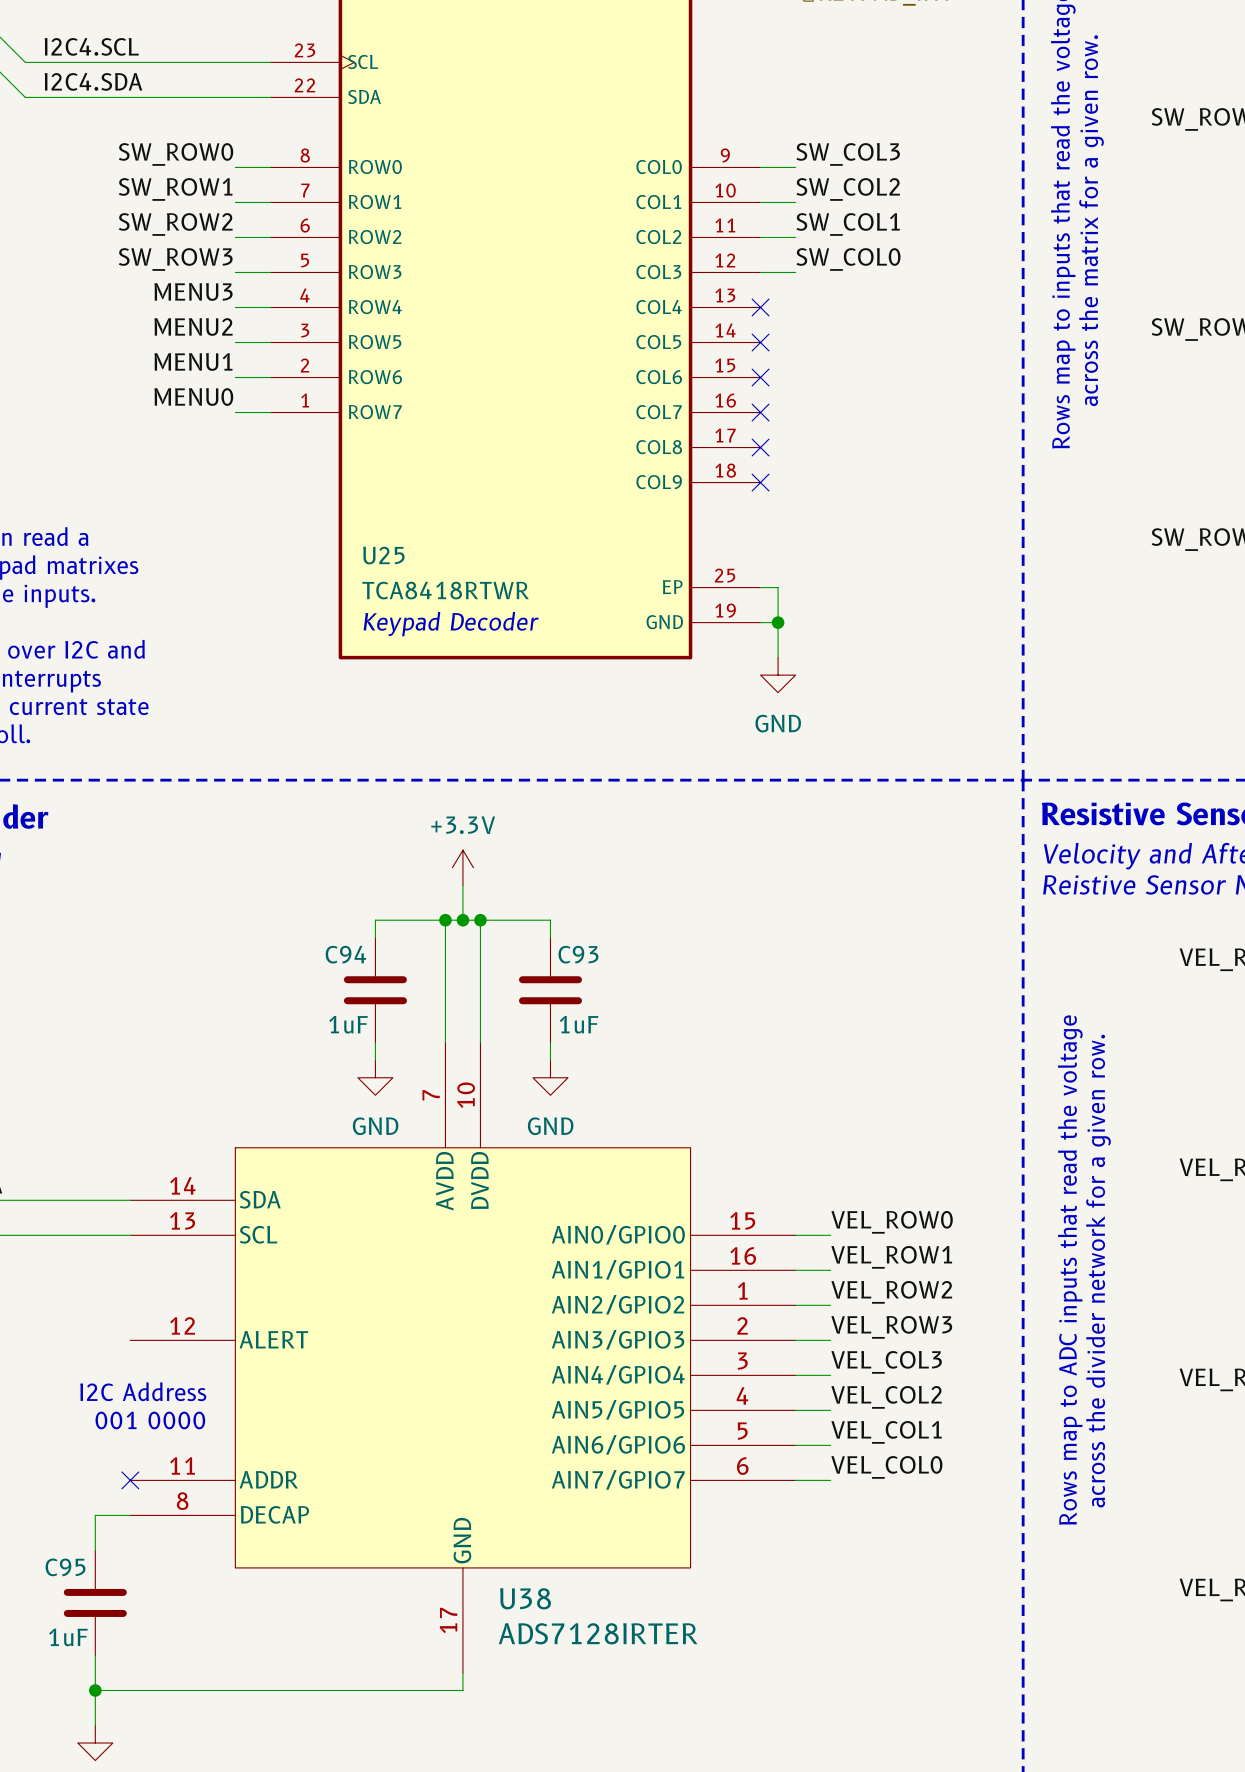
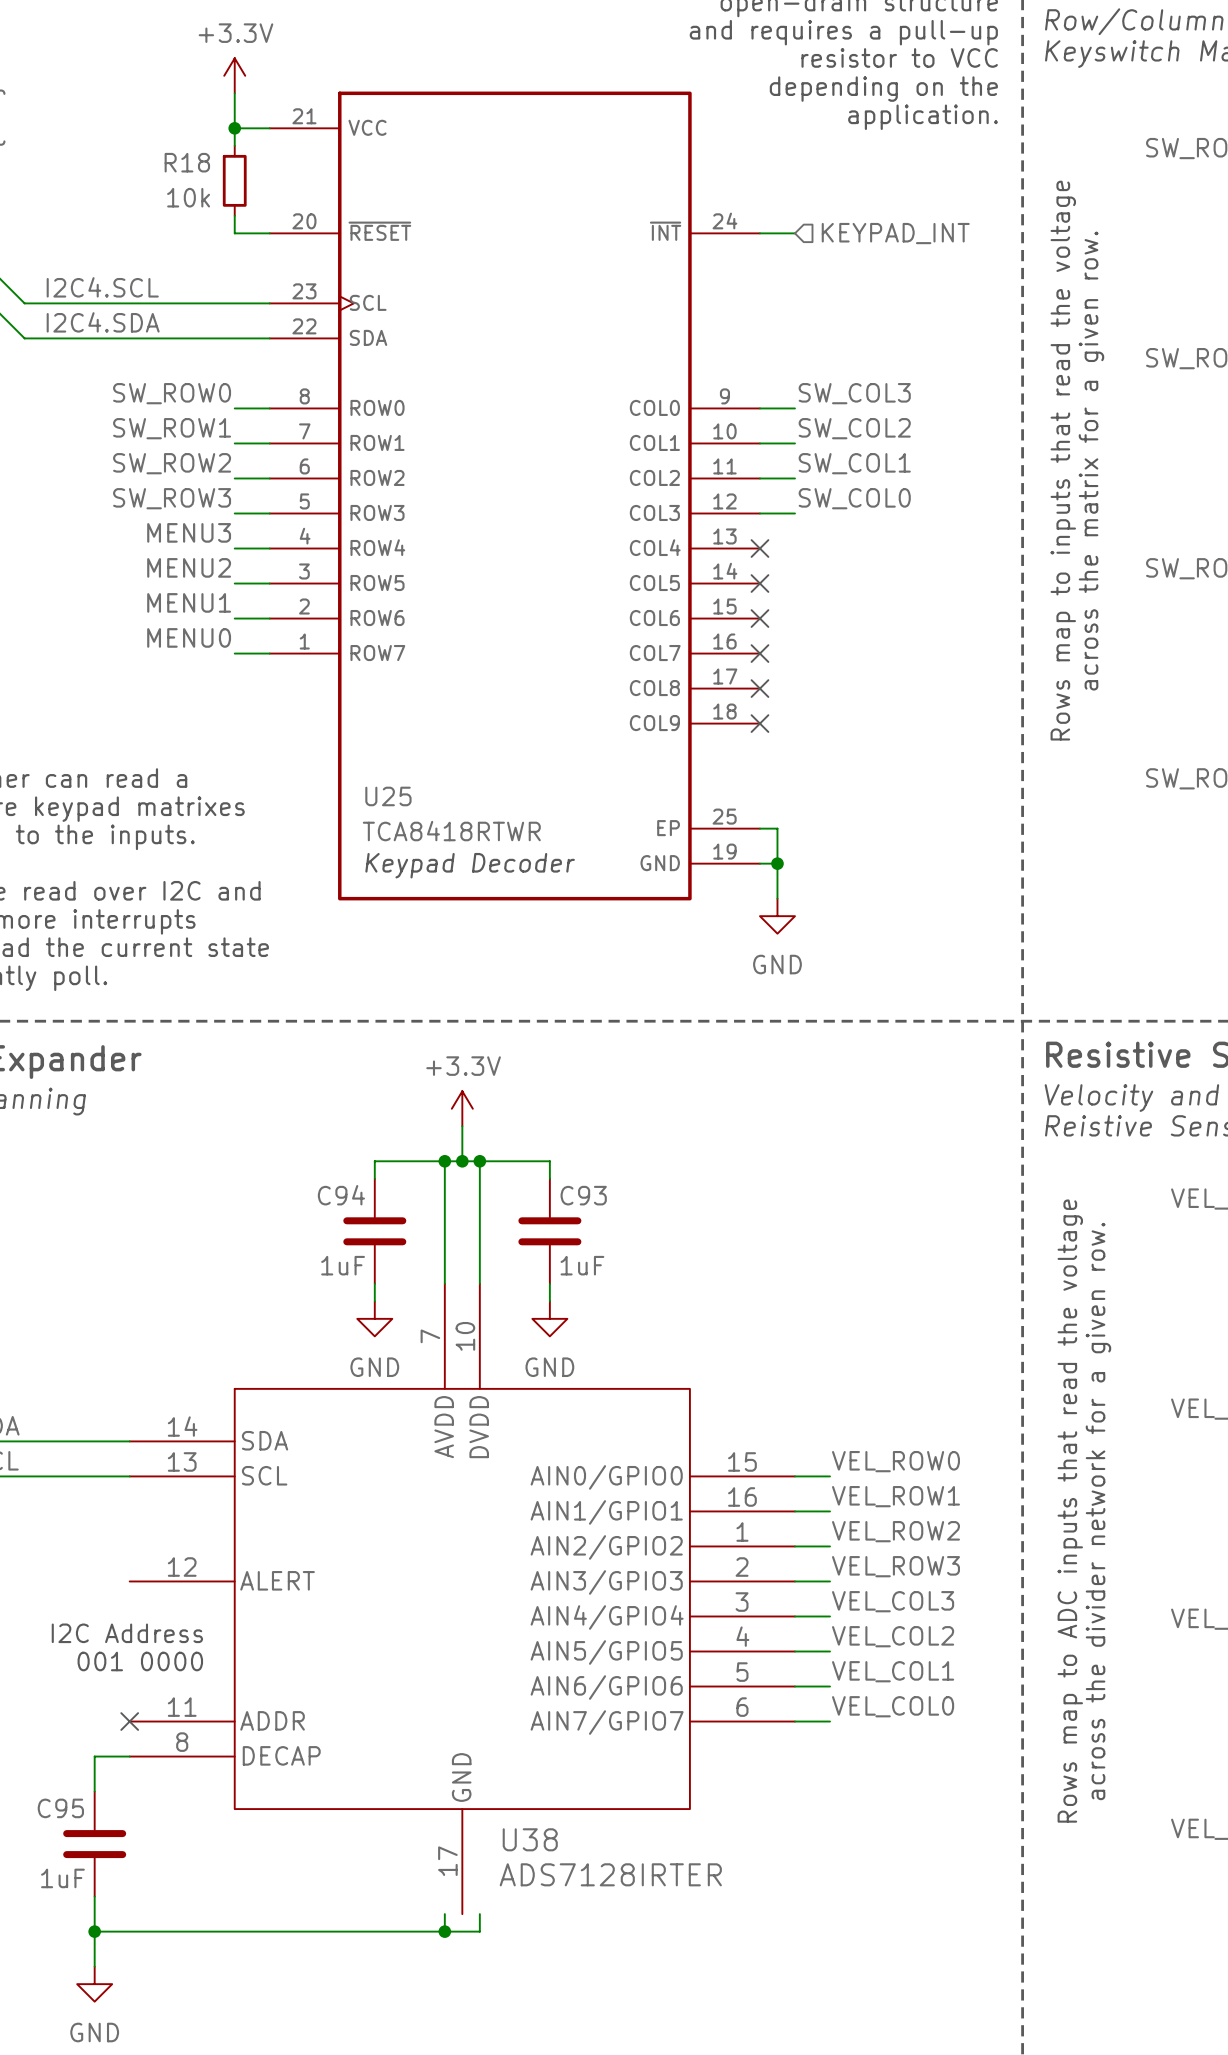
wire: none -> (444, 1914) (444, 1931)
wire: (462, 1672) (462, 1690) -> (479, 1914) (479, 1931) (462, 1931)
junction: none -> (444, 1931)

